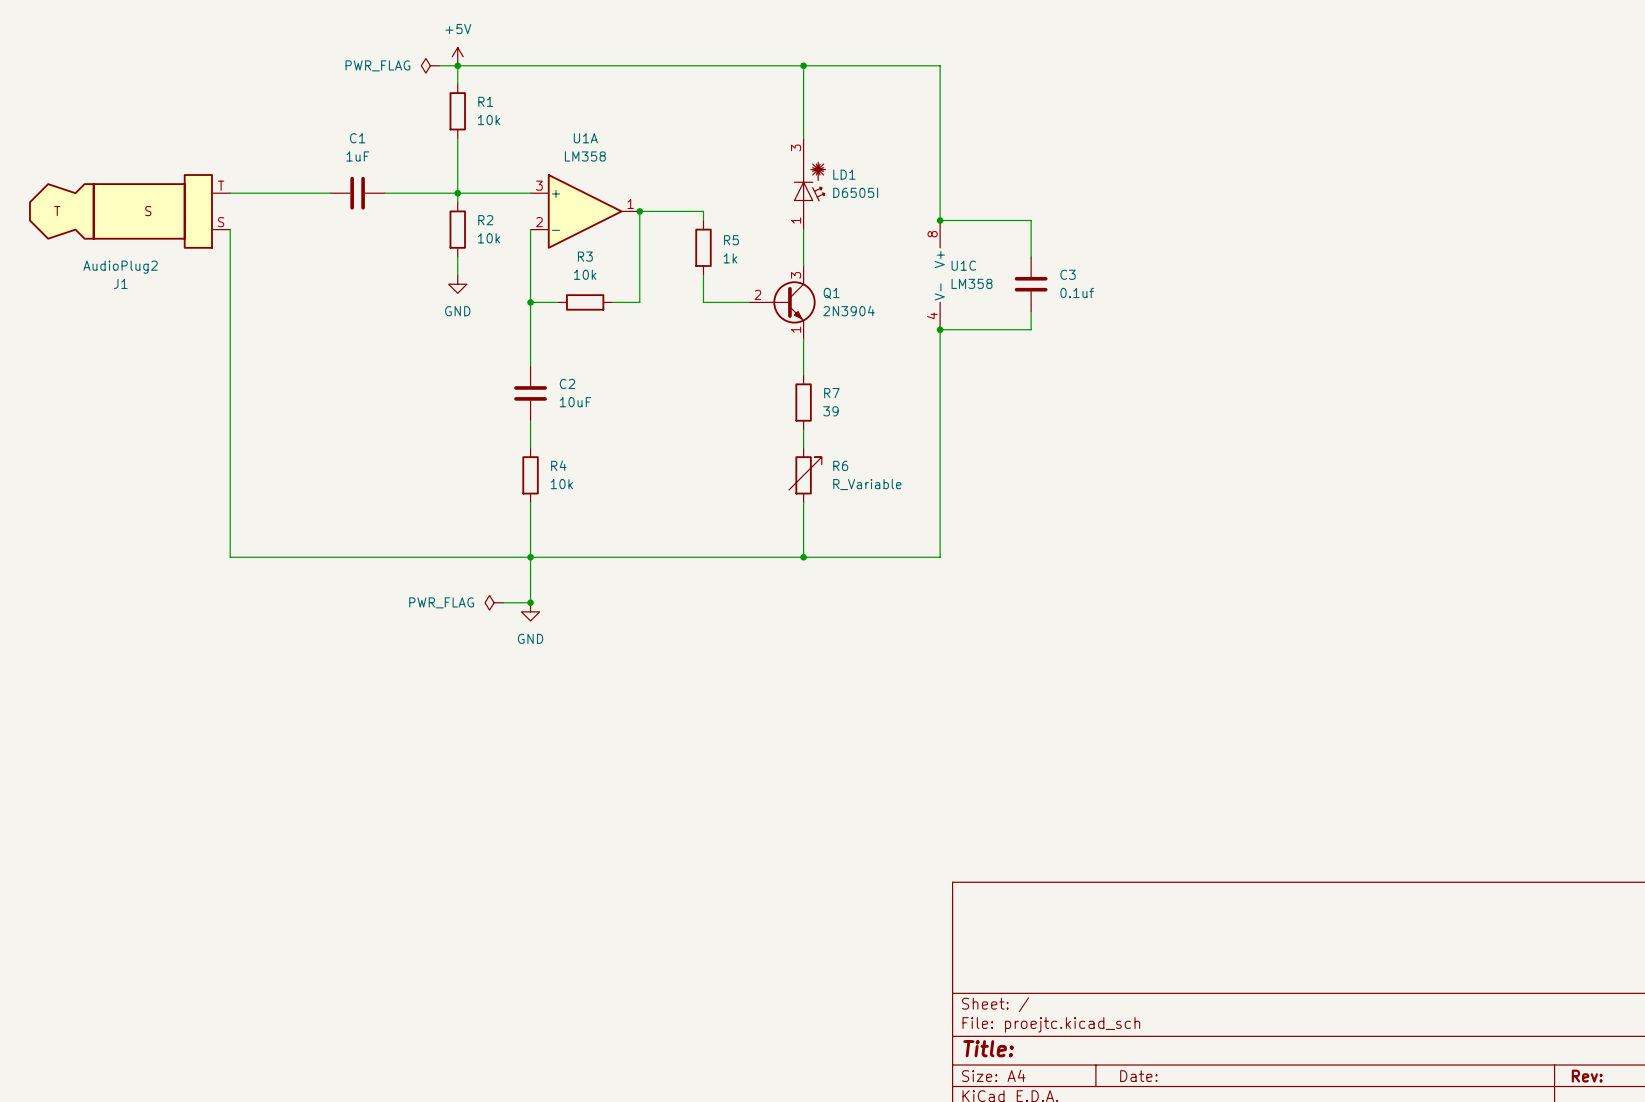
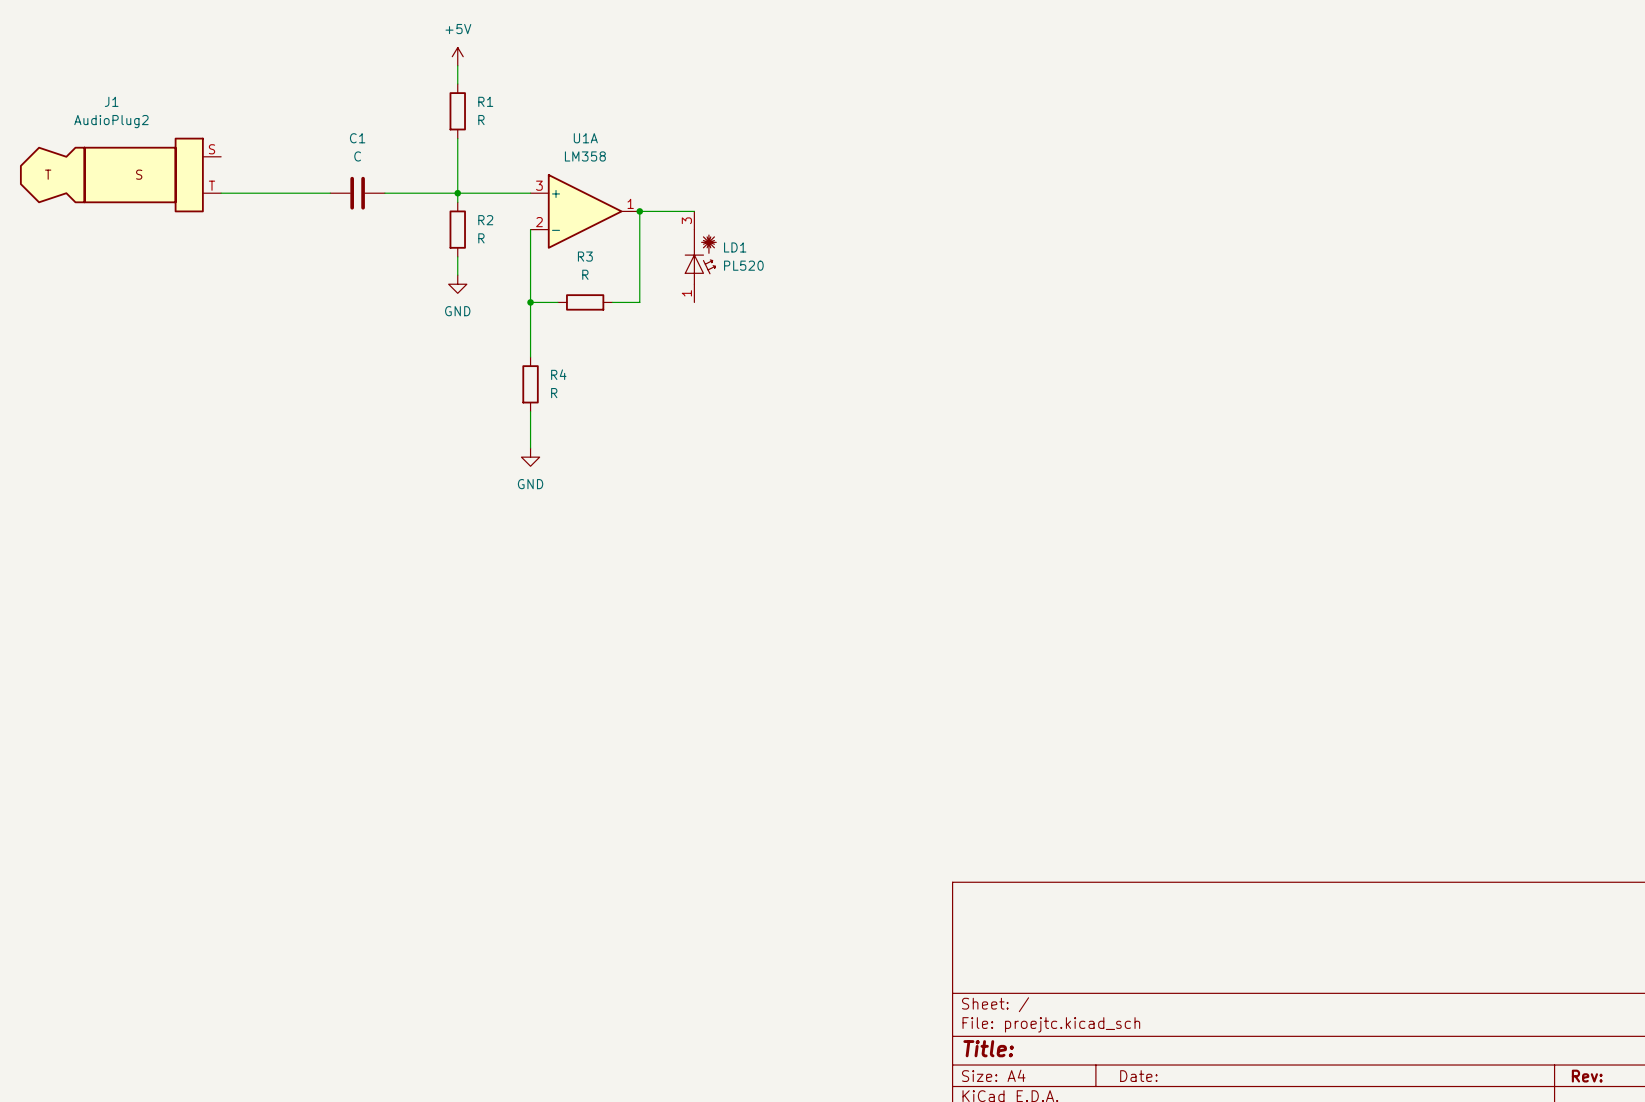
power symbol: PWR_FLAG (430, 65) -> none
wire: (439, 65) (940, 65) (940, 220) (1031, 220) (1031, 256) -> none
junction: (457, 65) -> none
wire: (803, 65) (803, 138) -> none
junction: (803, 65) -> none
R1 value: 10k (489, 120) -> R (481, 120)
C1 value: 1uF (357, 156) -> C (357, 156)
LD1 position: (809, 184) -> (700, 256)
LD1 value: D6505I (855, 192) -> PL520 (743, 265)
J1 flip: as is (120, 211) -> up-down (111, 175)
wire: (694, 211) (703, 211) (703, 220) -> none
junction: (940, 220) -> none
wire: (230, 229) (230, 557) (940, 557) (940, 329) (1031, 329) (1031, 311) -> none
wire: (803, 229) (803, 266) -> none
R2 value: 10k (489, 238) -> R (481, 238)
R5: 1k (703, 247) -> none
R3 value: 10k (585, 274) -> R (585, 274)
wire: (703, 275) (703, 302) (748, 302) -> none
U1C: LM358 (940, 275) -> none
C3: 0.1uf (1031, 284) -> none
Q1: 2N3904 (782, 302) -> none
junction: (940, 329) -> none
wire: (803, 338) (803, 375) -> none
C2: 10uF (530, 393) -> none
R7: 39 (803, 402) -> none
wire: (803, 429) (803, 448) -> none
R4 position: (530, 475) -> (530, 384)
R6: R_Variable (805, 475) -> none
R4 value: 10k (561, 484) -> R (554, 393)
wire: (530, 502) (530, 602) (503, 602) -> none
wire: (803, 502) (803, 557) -> none
junction: (530, 557) -> none
junction: (803, 557) -> none
power symbol: PWR_FLAG (494, 602) -> none
junction: (530, 602) -> none
power symbol position: GND (530, 611) -> GND (530, 457)

